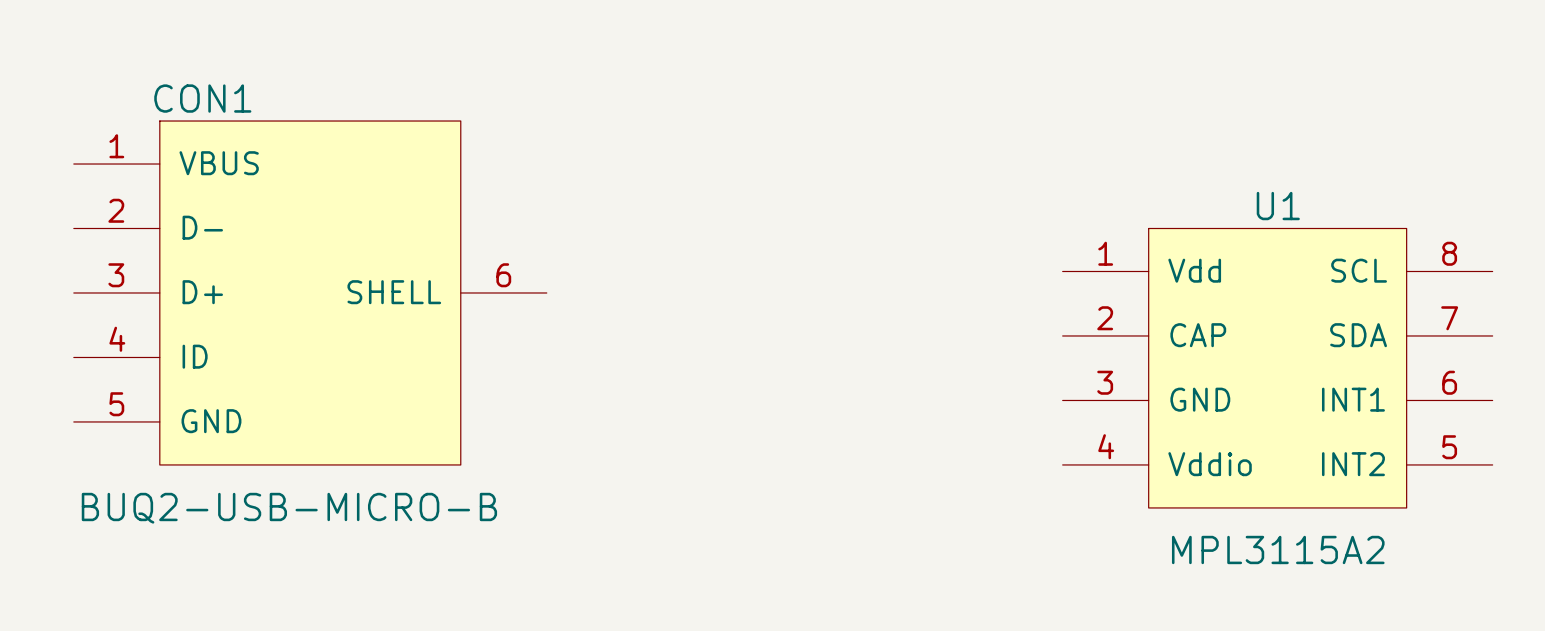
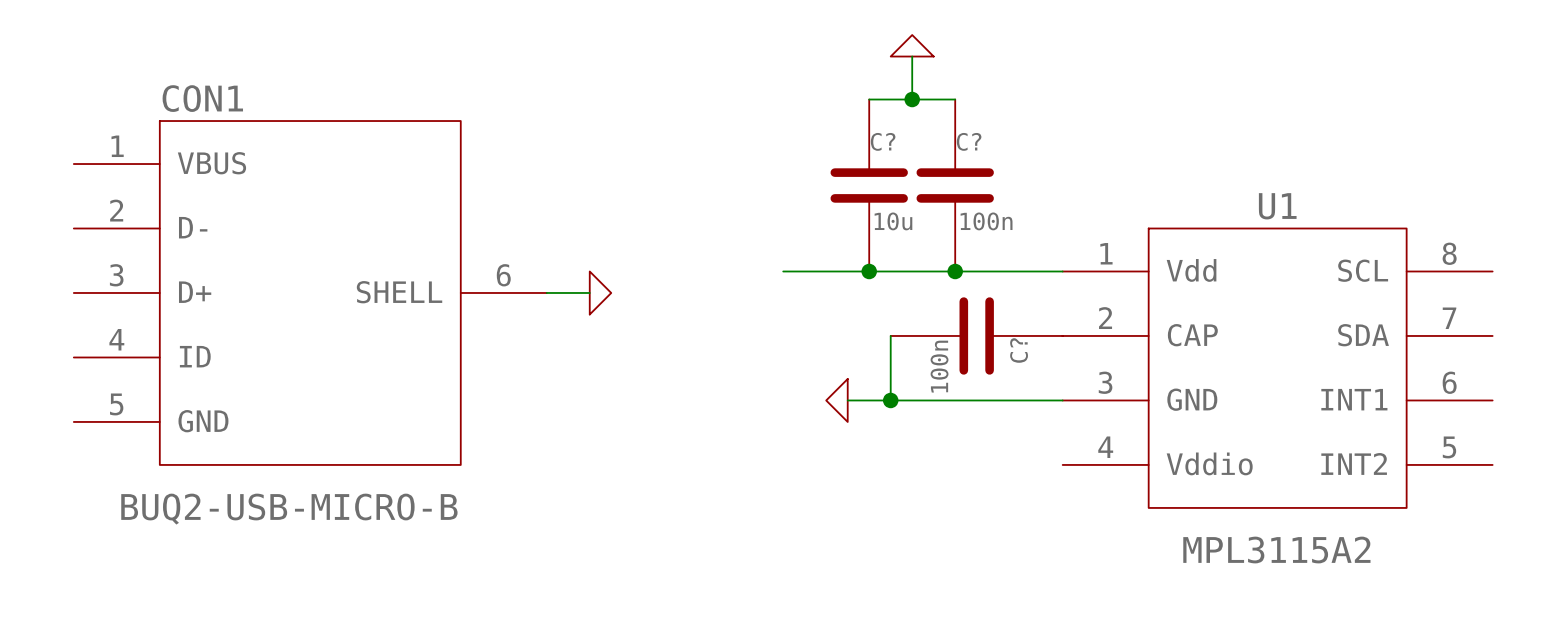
power symbol: none -> (912, 45)
wire: none -> (912, 56) (912, 99)
wire: none -> (869, 99) (955, 99)
junction: none -> (912, 99)
C?: none -> 10u (869, 185)
C?: none -> 100n (955, 185)
wire: none -> (783, 271) (1062, 271)
junction: none -> (869, 271)
junction: none -> (955, 271)
wire: none -> (546, 292) (589, 292)
power symbol: none -> (600, 292)
wire: none -> (890, 335) (890, 400)
C?: none -> 100n (976, 335)
power symbol: none -> (836, 400)
wire: none -> (847, 400) (1062, 400)
junction: none -> (890, 400)

